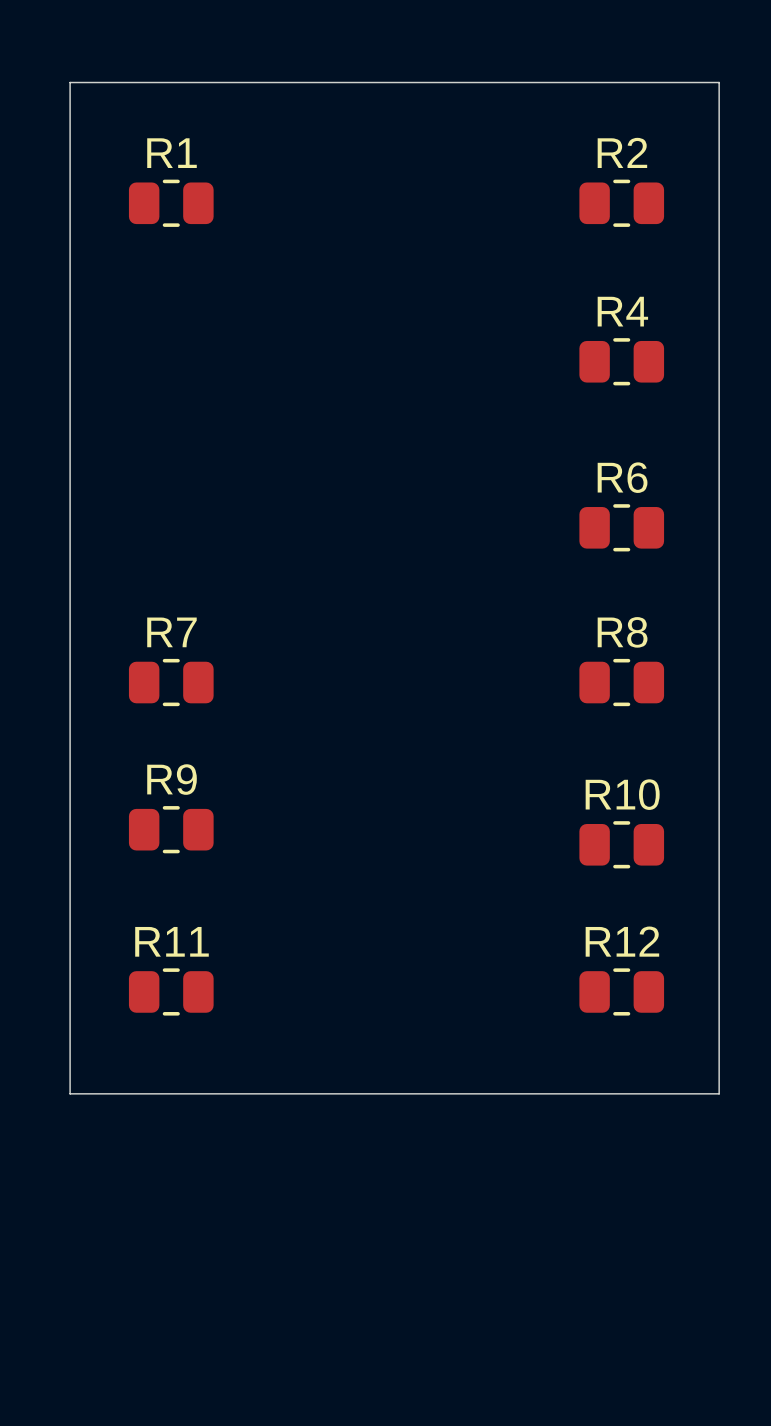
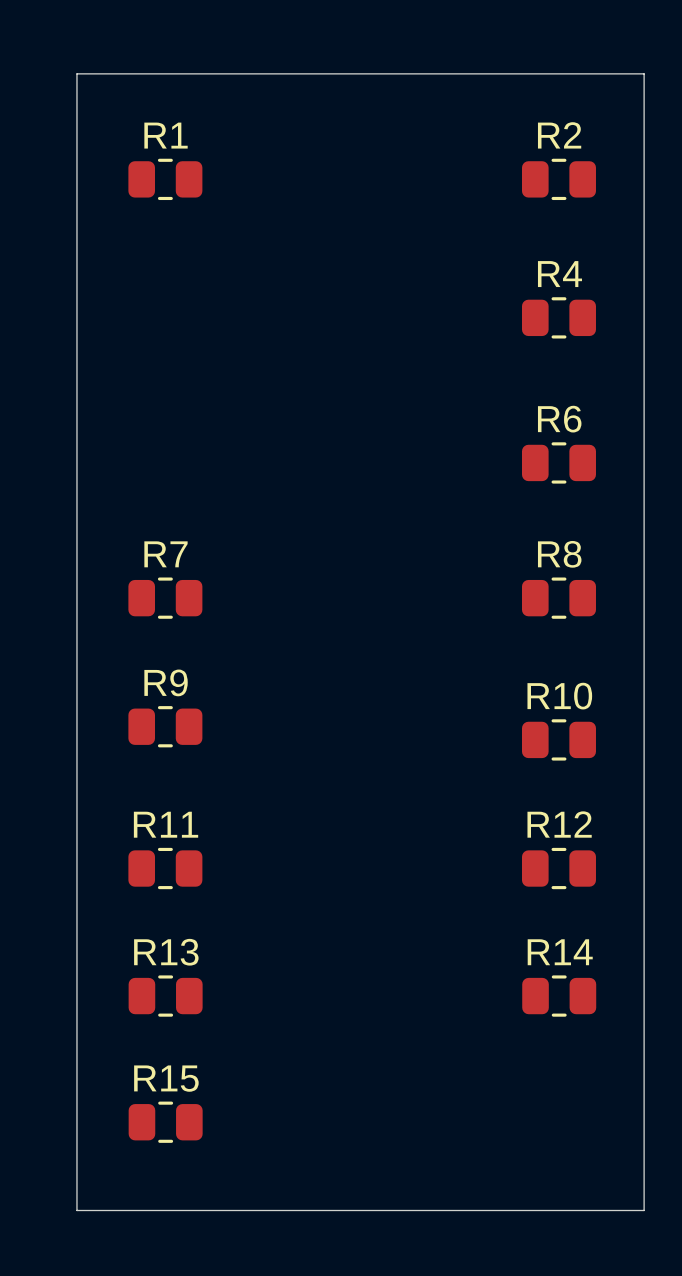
board edge: (70, 1093) (719, 1093) -> (76, 957) (76, 1210) (644, 1210) (644, 957)
R13: none -> (165, 996)
R14: none -> (559, 996)
R15: none -> (165, 1122)

